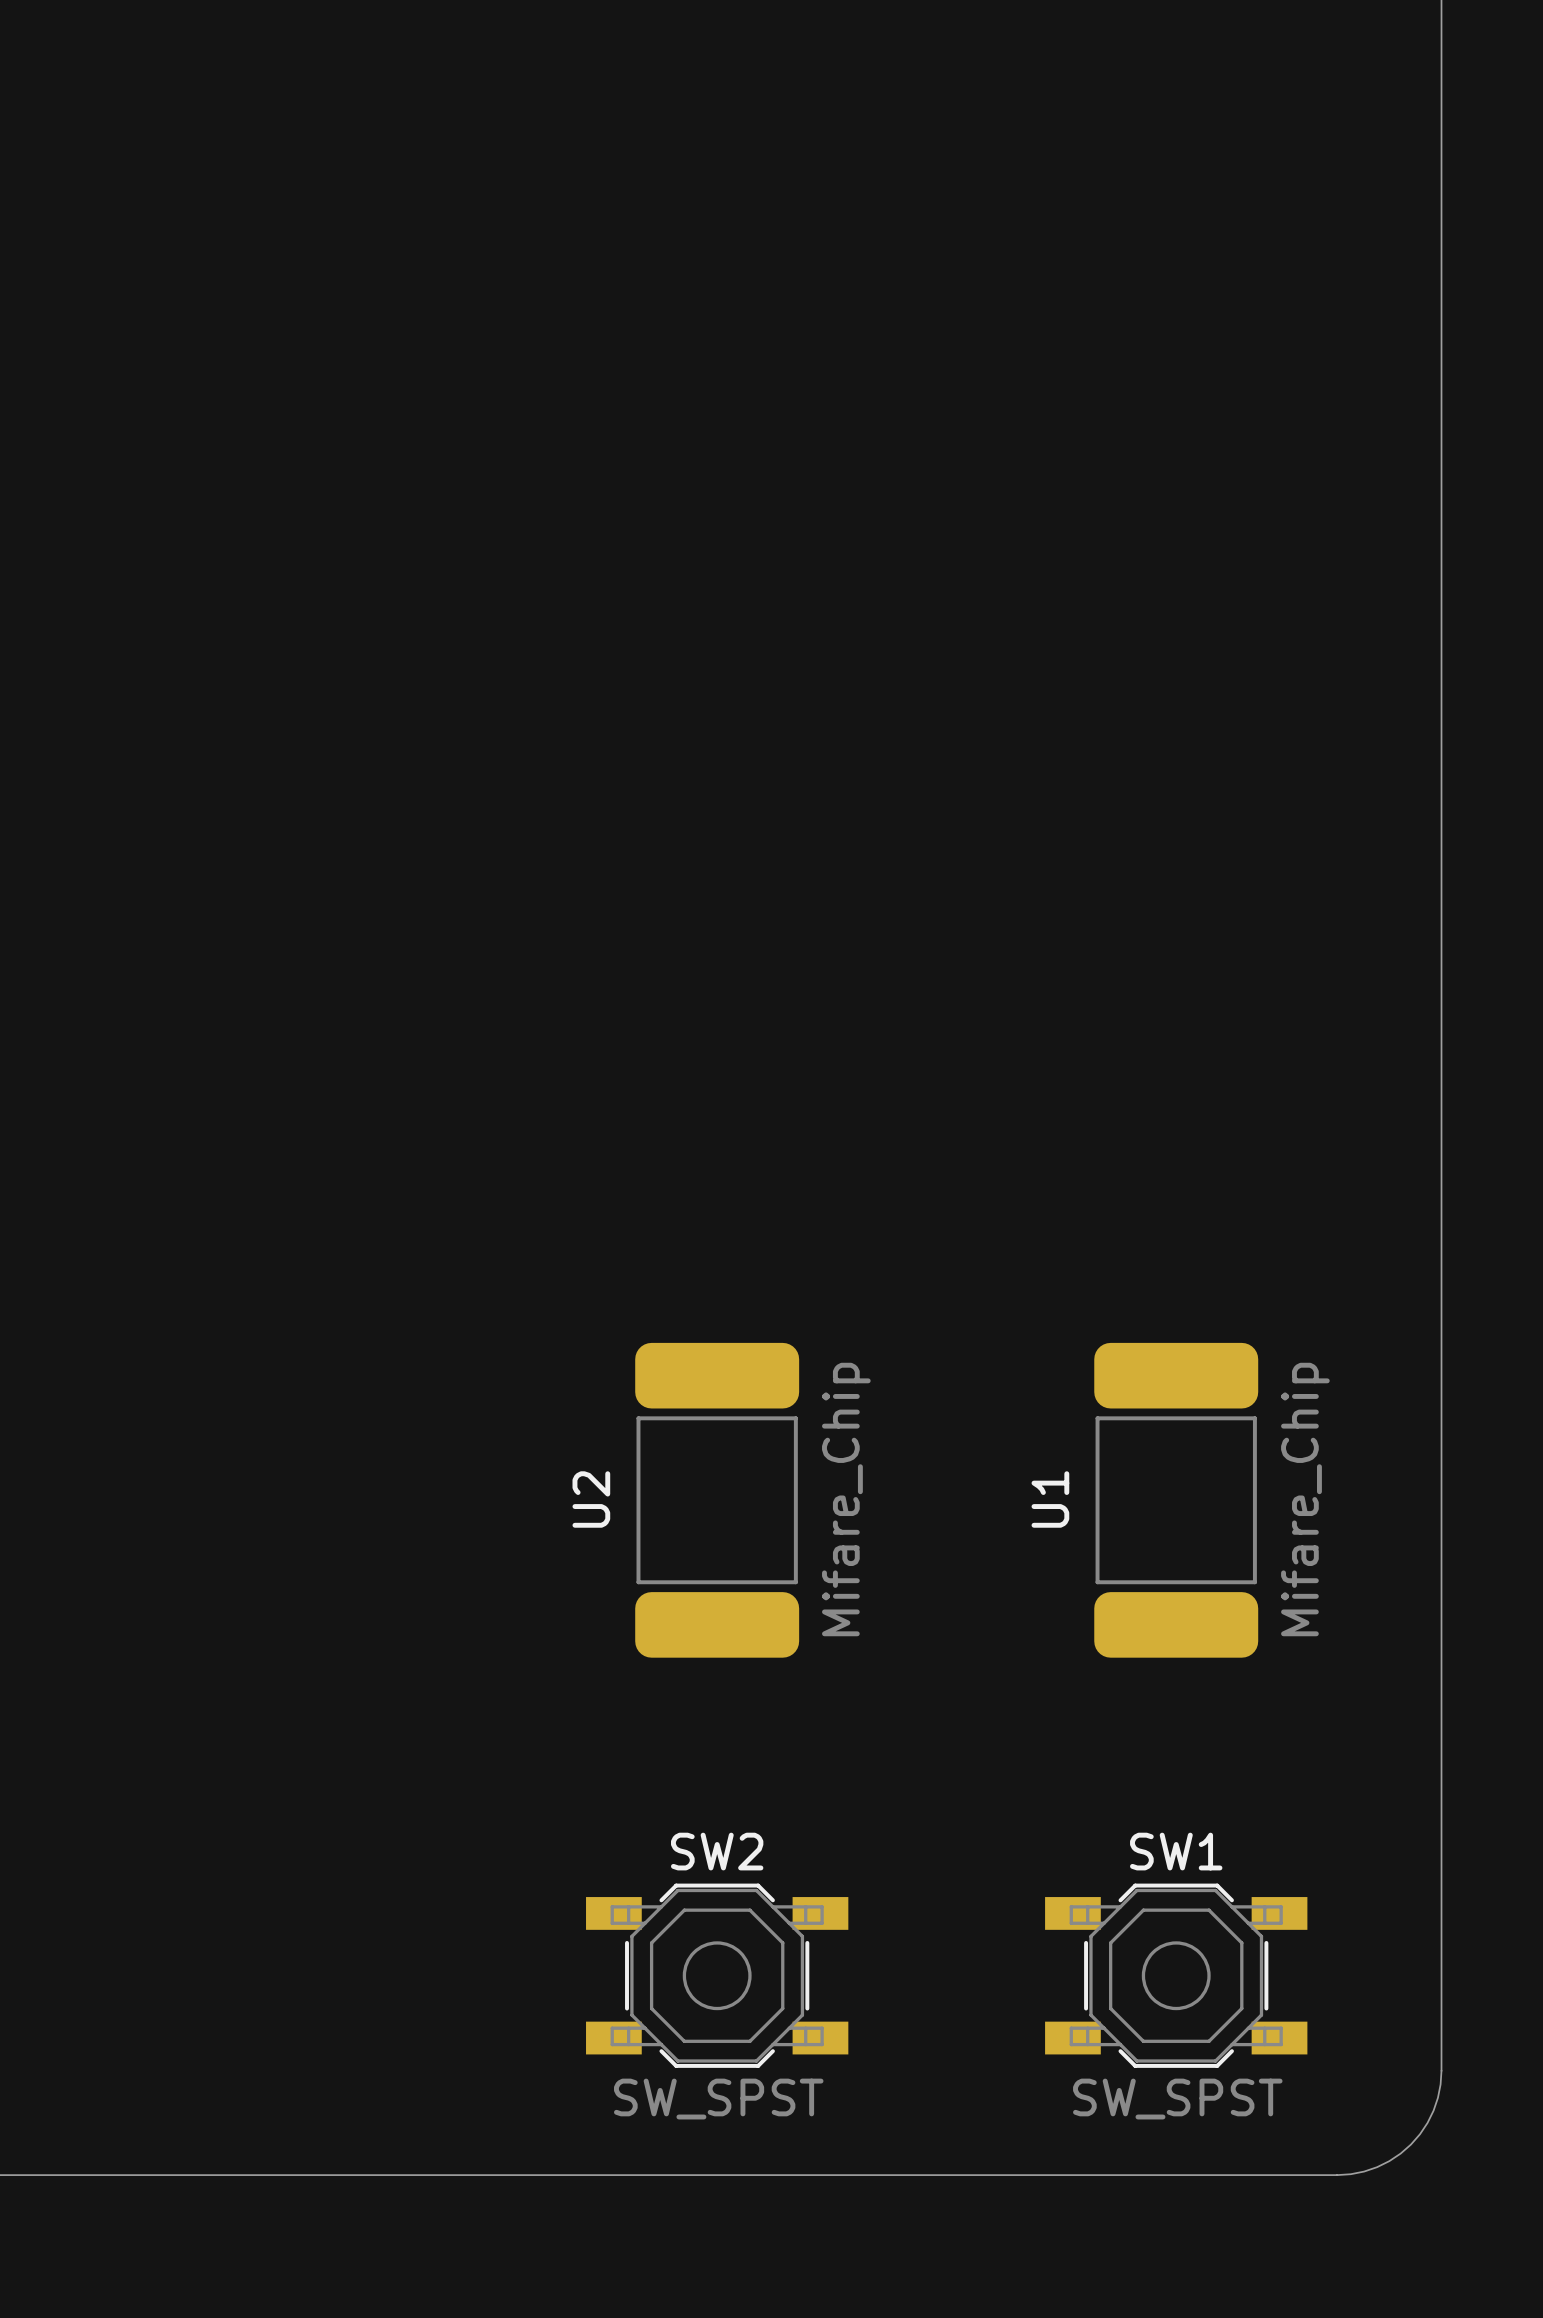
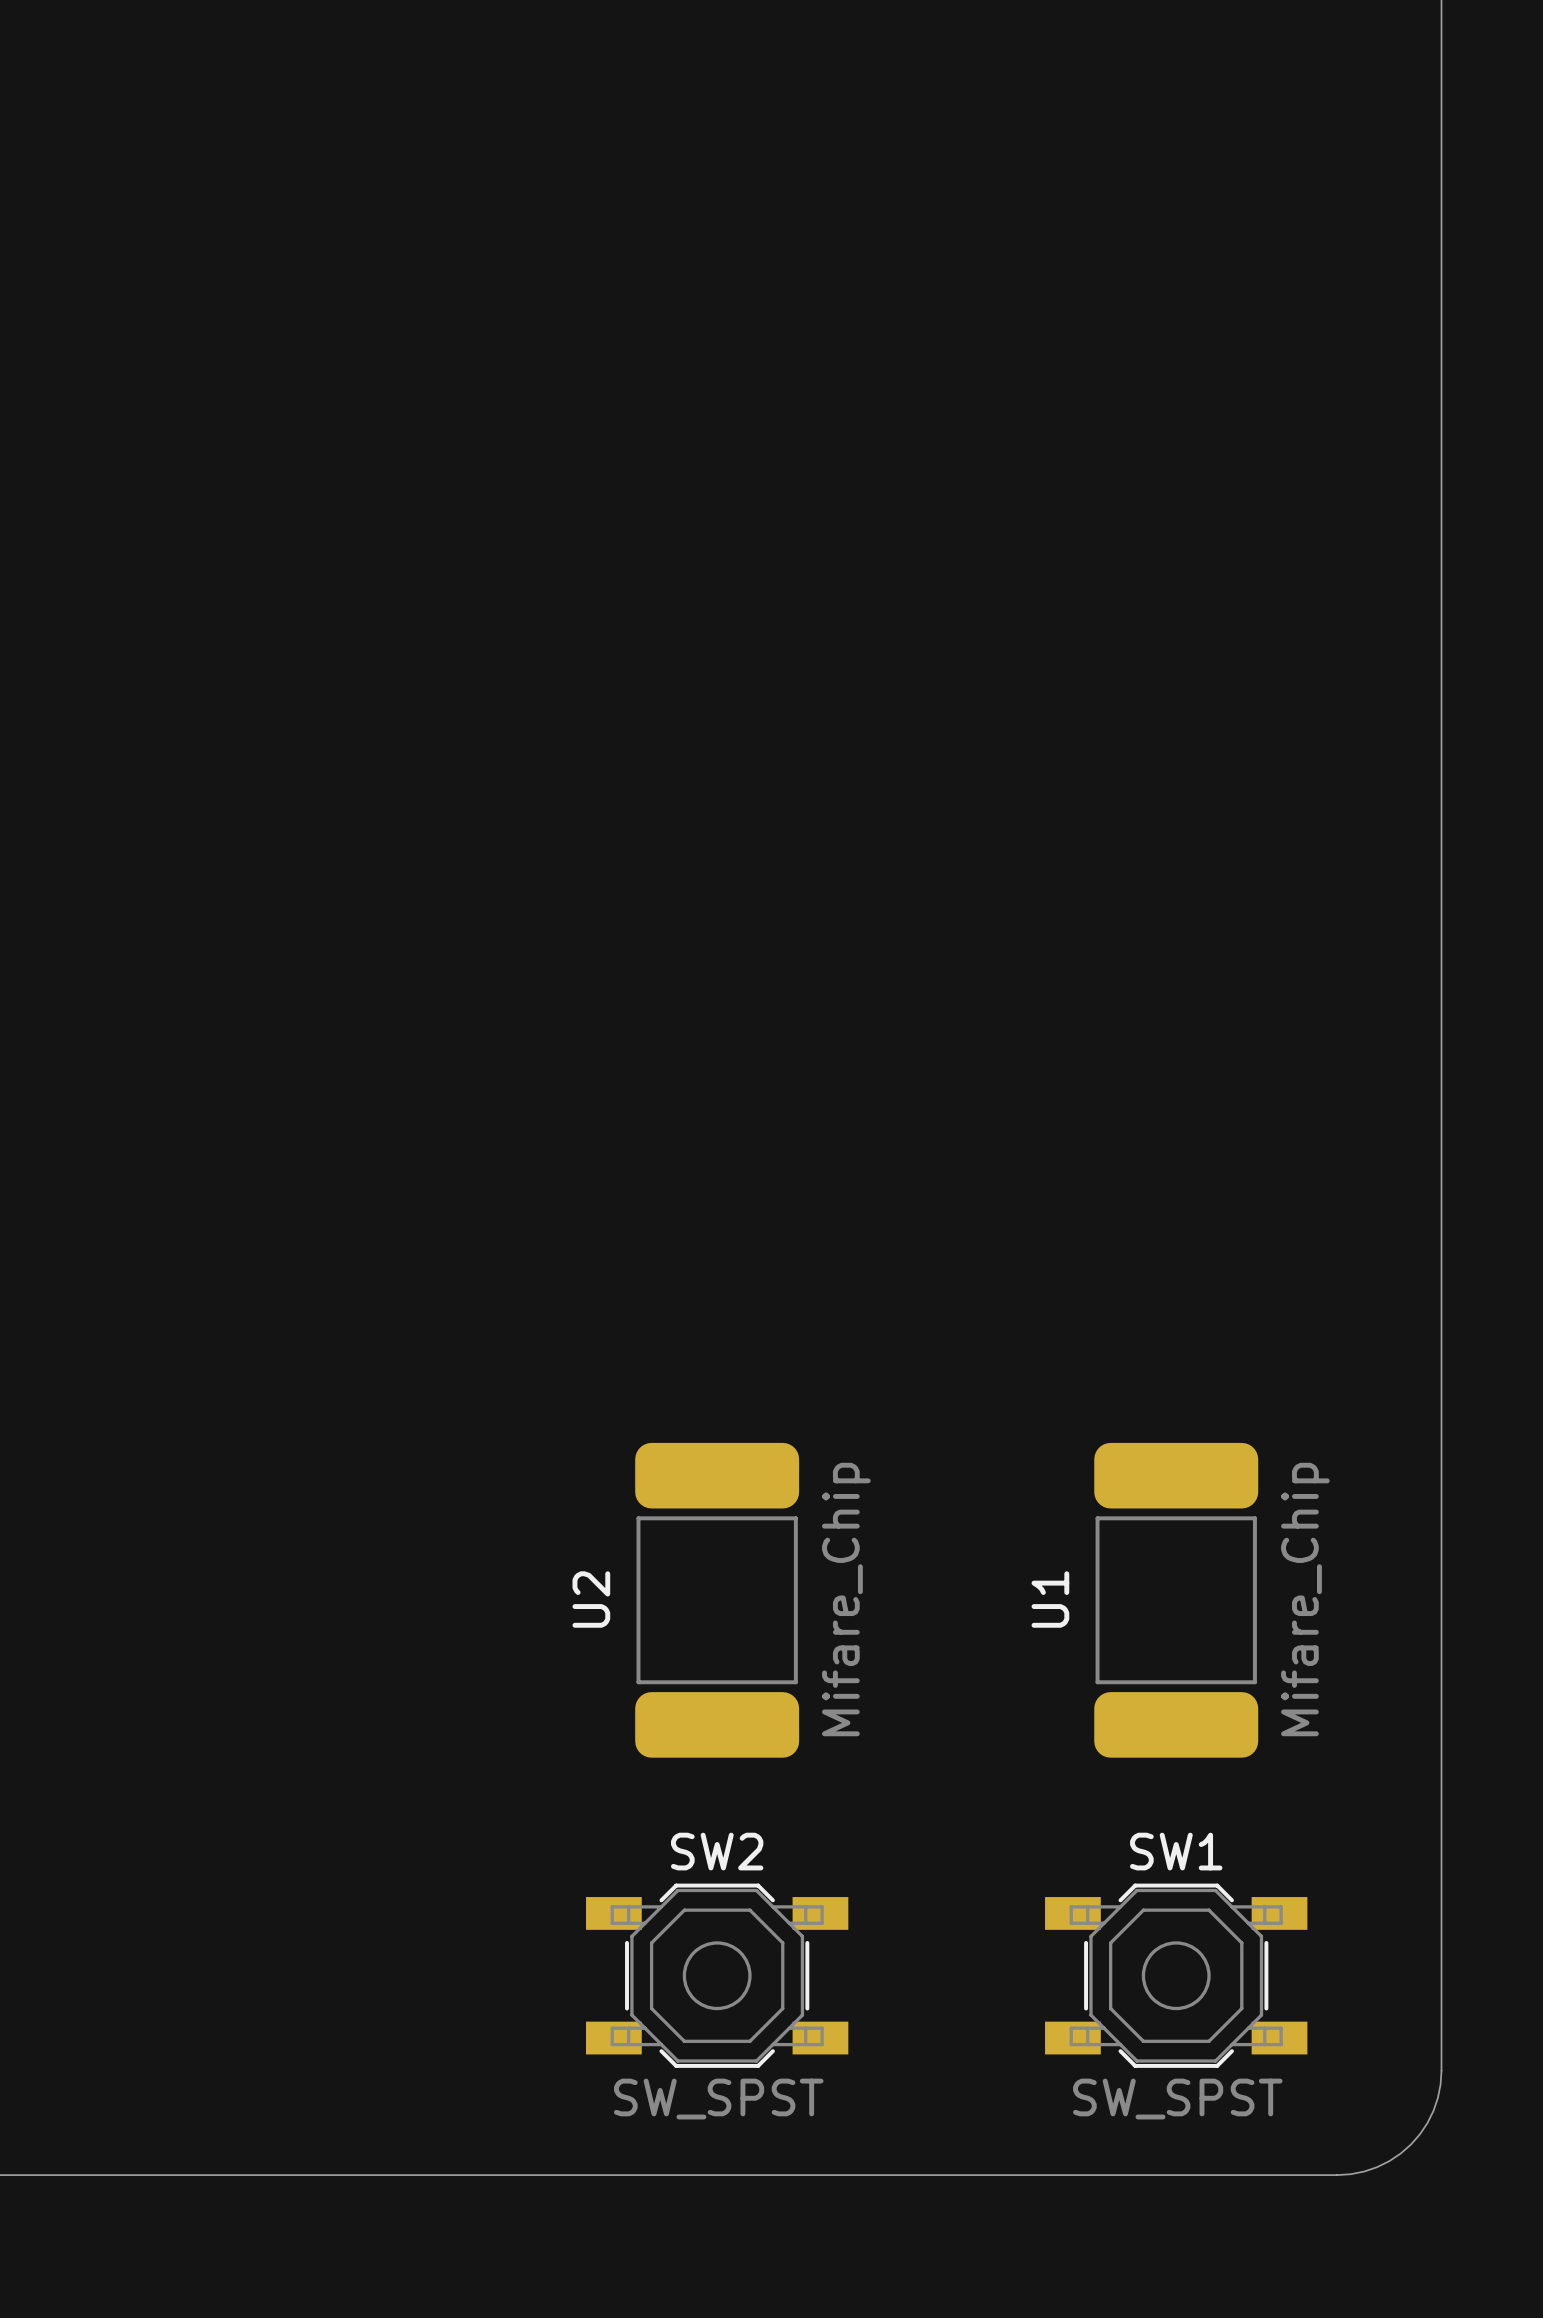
U2 position: (717, 1500) -> (717, 1600)
U1 position: (1176, 1500) -> (1176, 1600)

